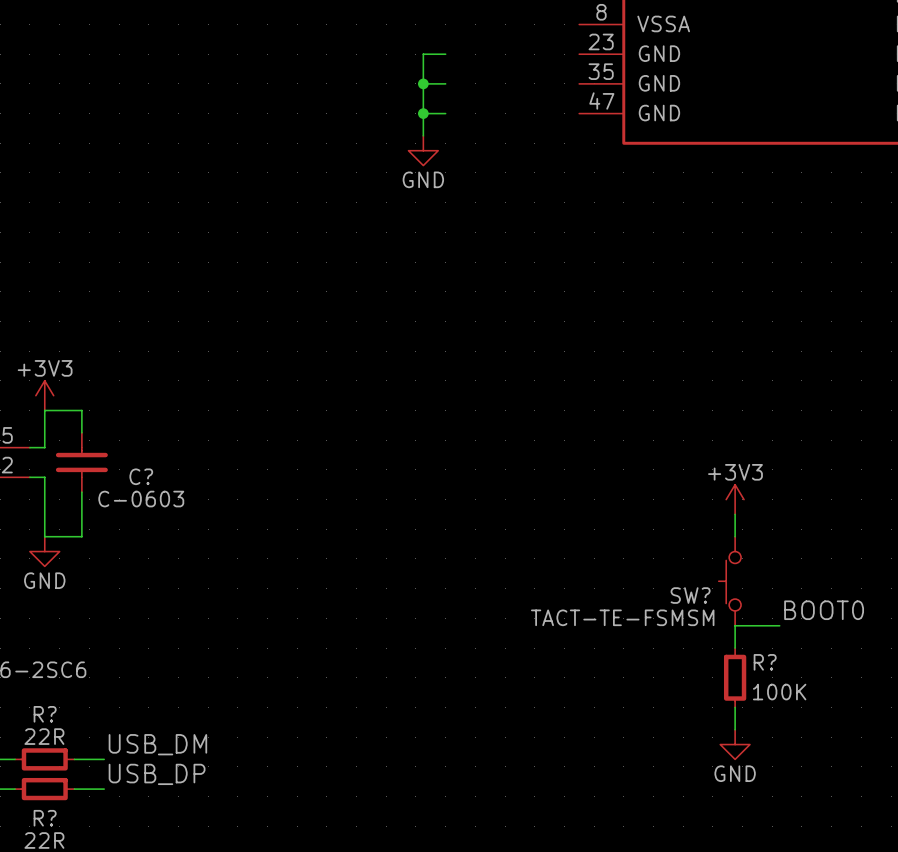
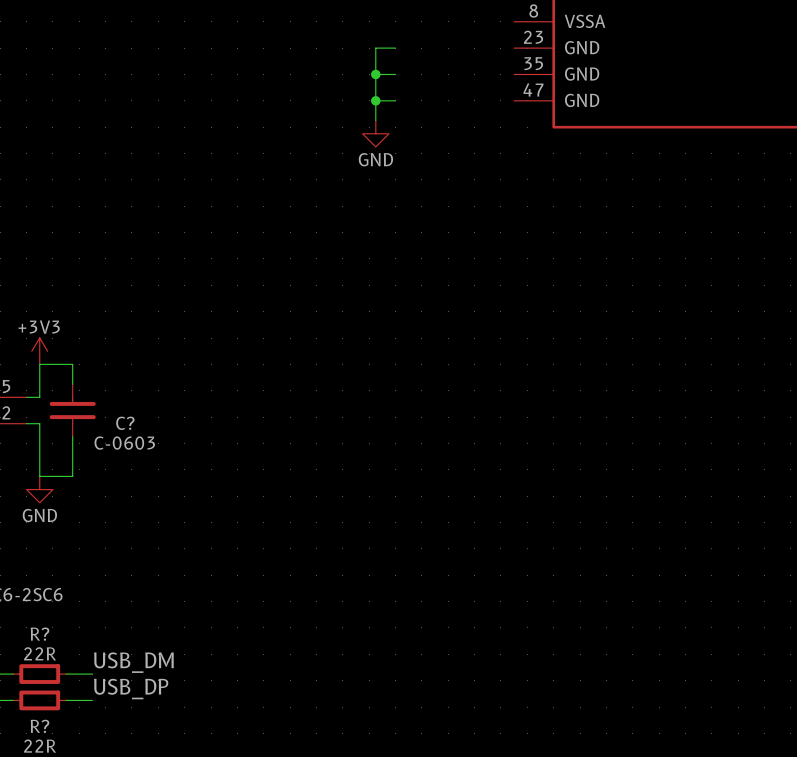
power symbol: +3V3 (735, 499) -> none
wire: (735, 514) (735, 536) -> none
SW?: TACT-TE-FSMSM (729, 581) -> none
label: BOOT0 (824, 610) -> none
wire: (779, 625) (735, 625) (735, 648) -> none
R?: 100K (735, 677) -> none
wire: (735, 707) (735, 729) -> none
power symbol: GND (735, 744) -> none

